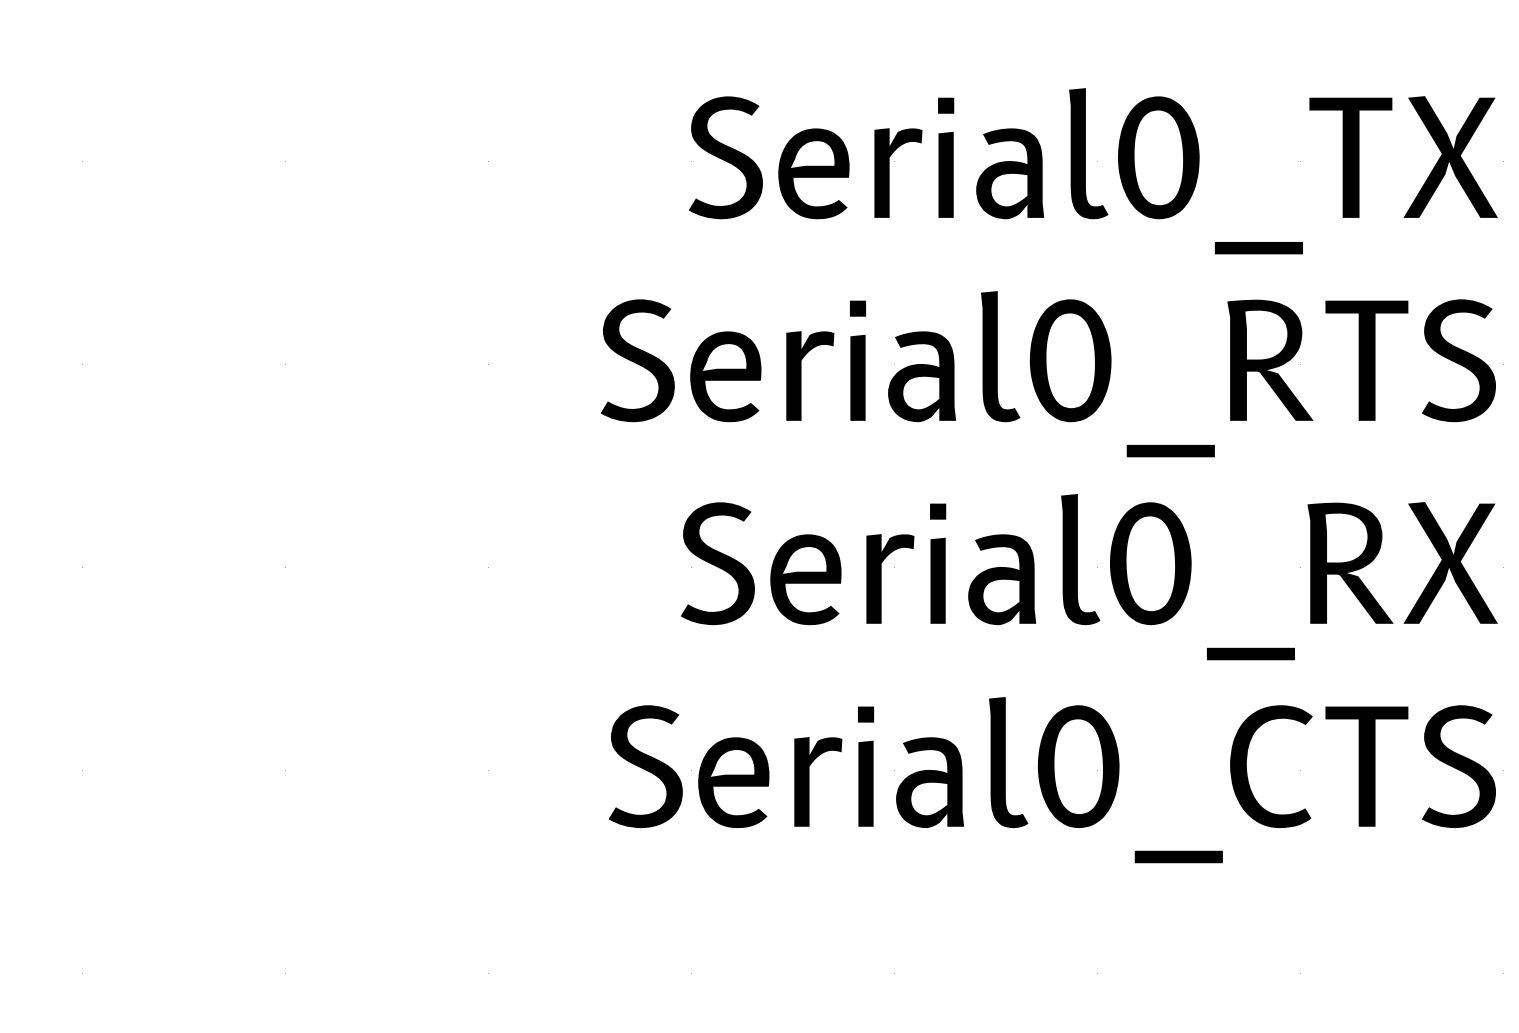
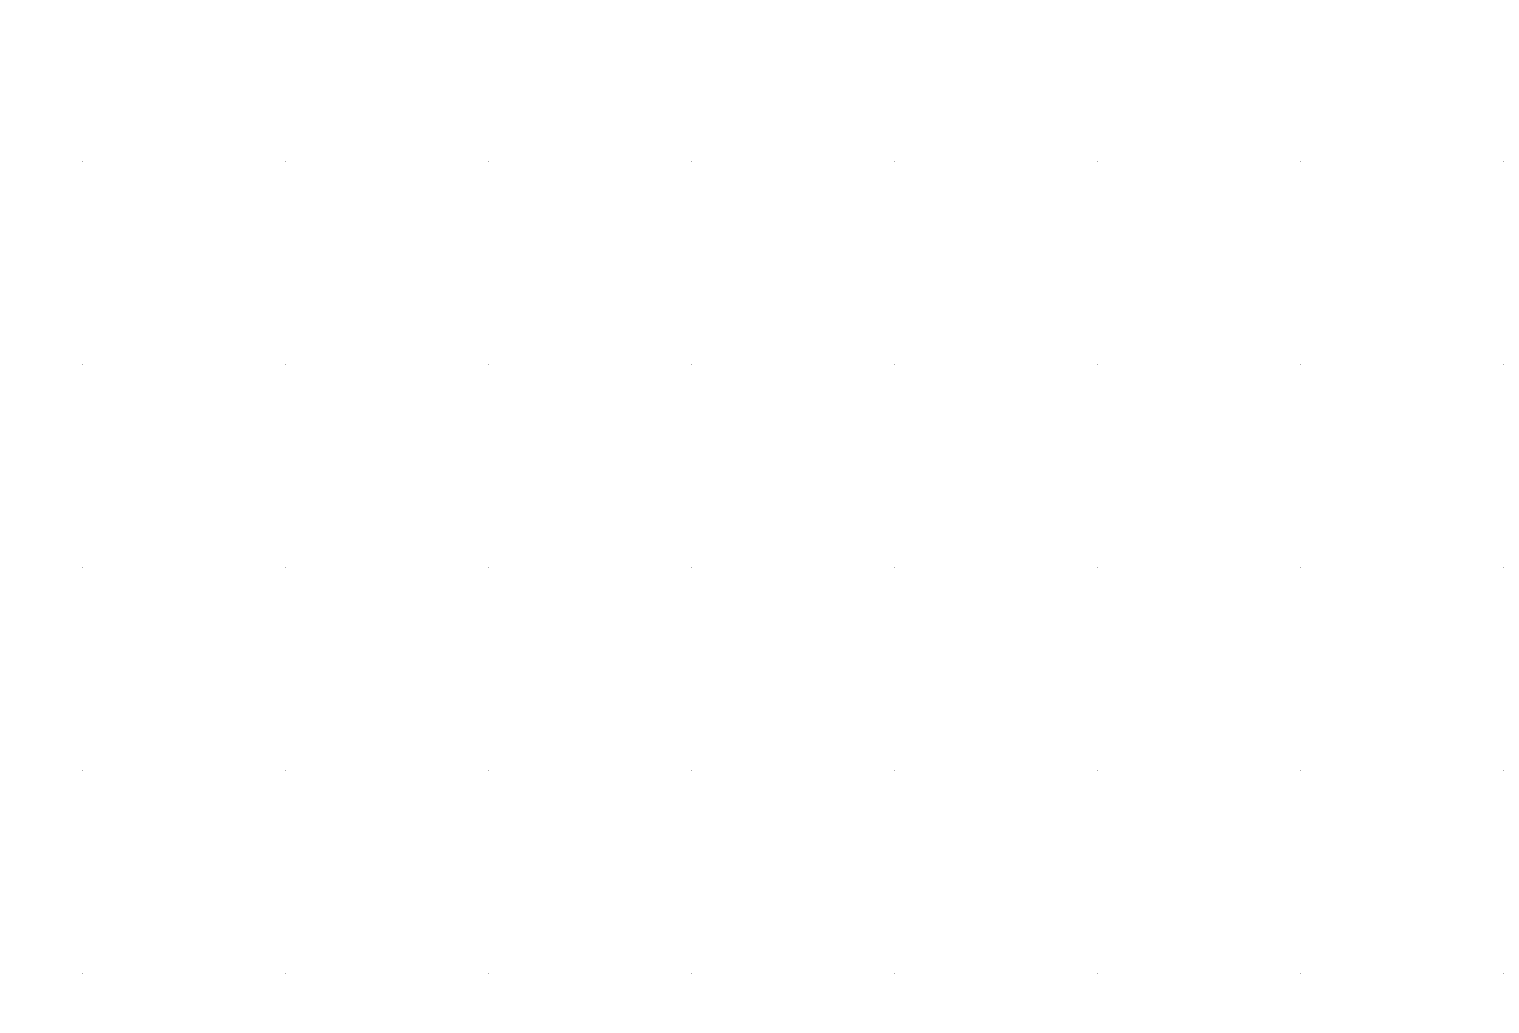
label: Serial0_TX (1093, 171) -> none
label: Serial0_RTS (1048, 374) -> none
label: Serial0_RX (1089, 577) -> none
label: Serial0_CTS (1052, 780) -> none

